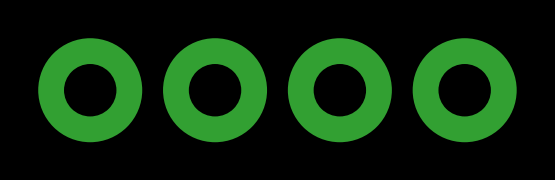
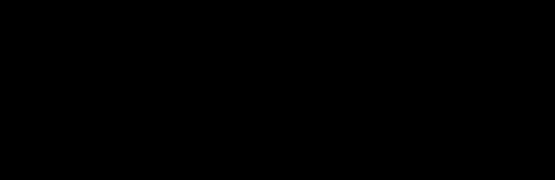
part: (90, 90) -> none
part: (215, 90) -> none
part: (339, 90) -> none
part: (464, 90) -> none

